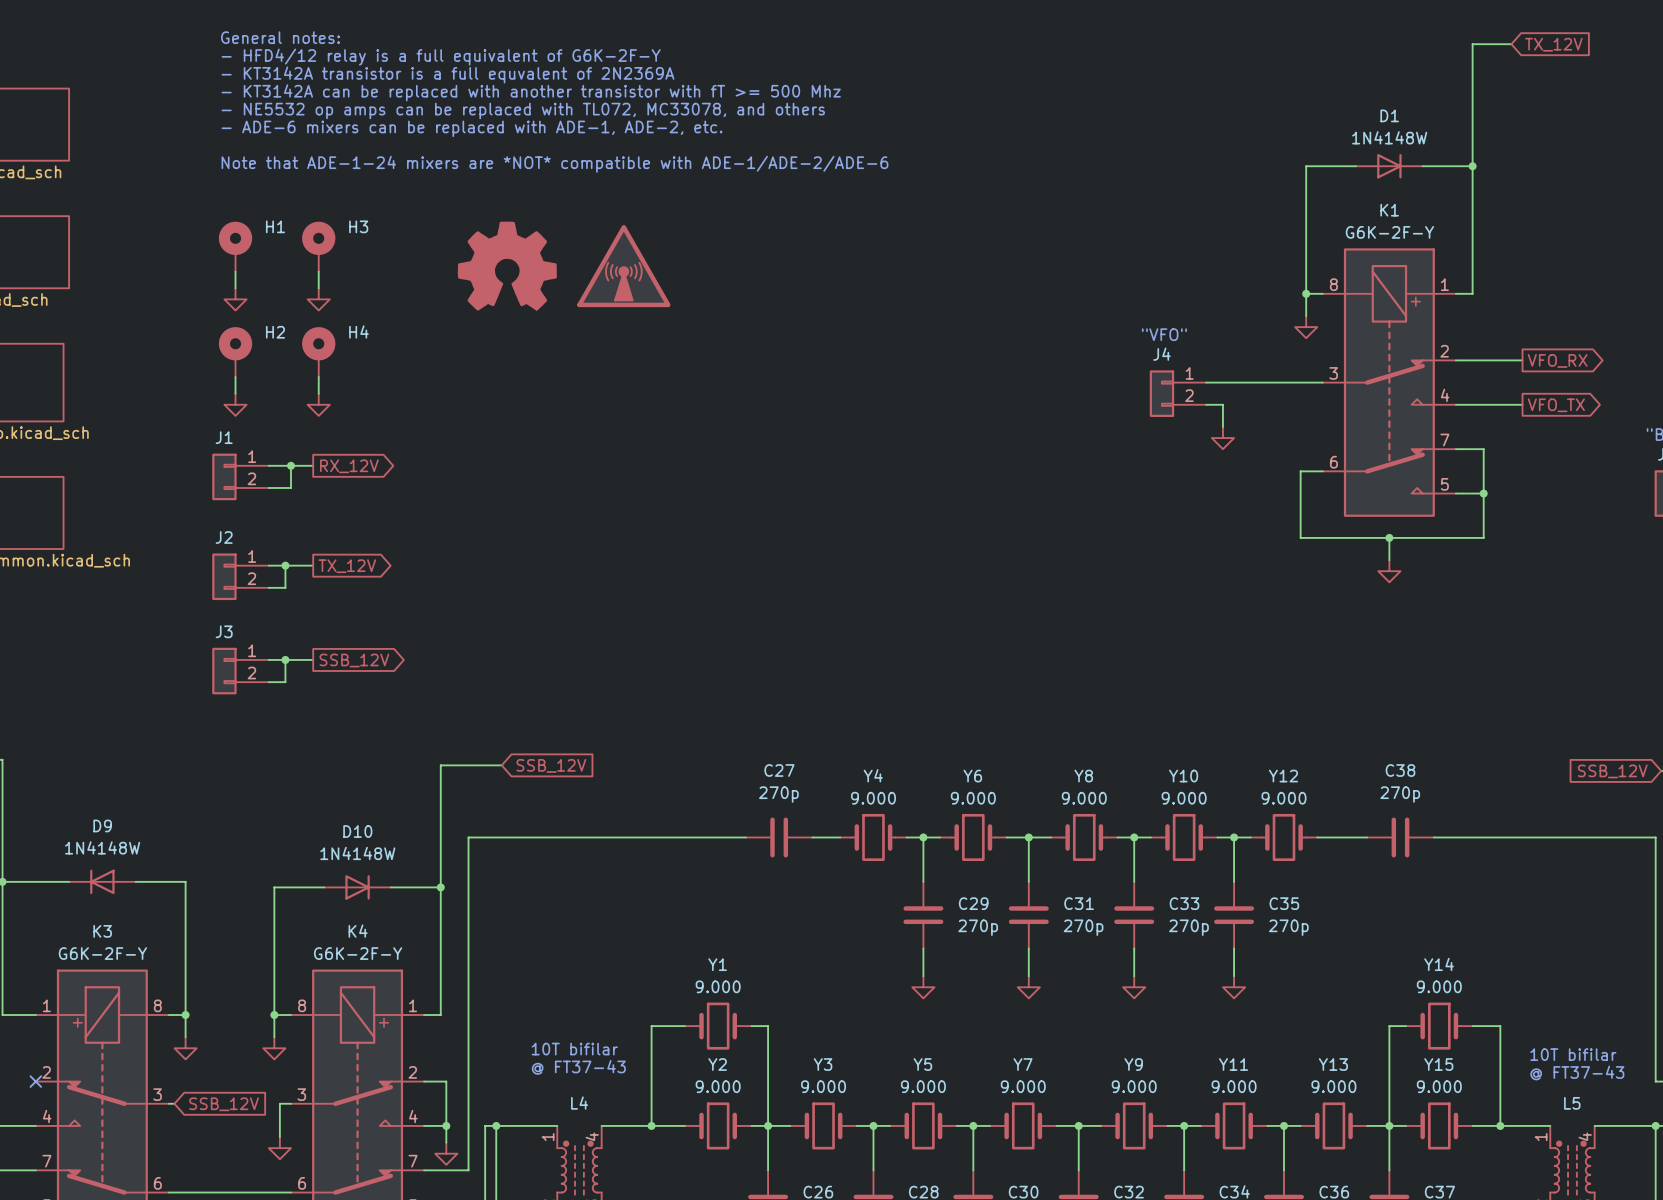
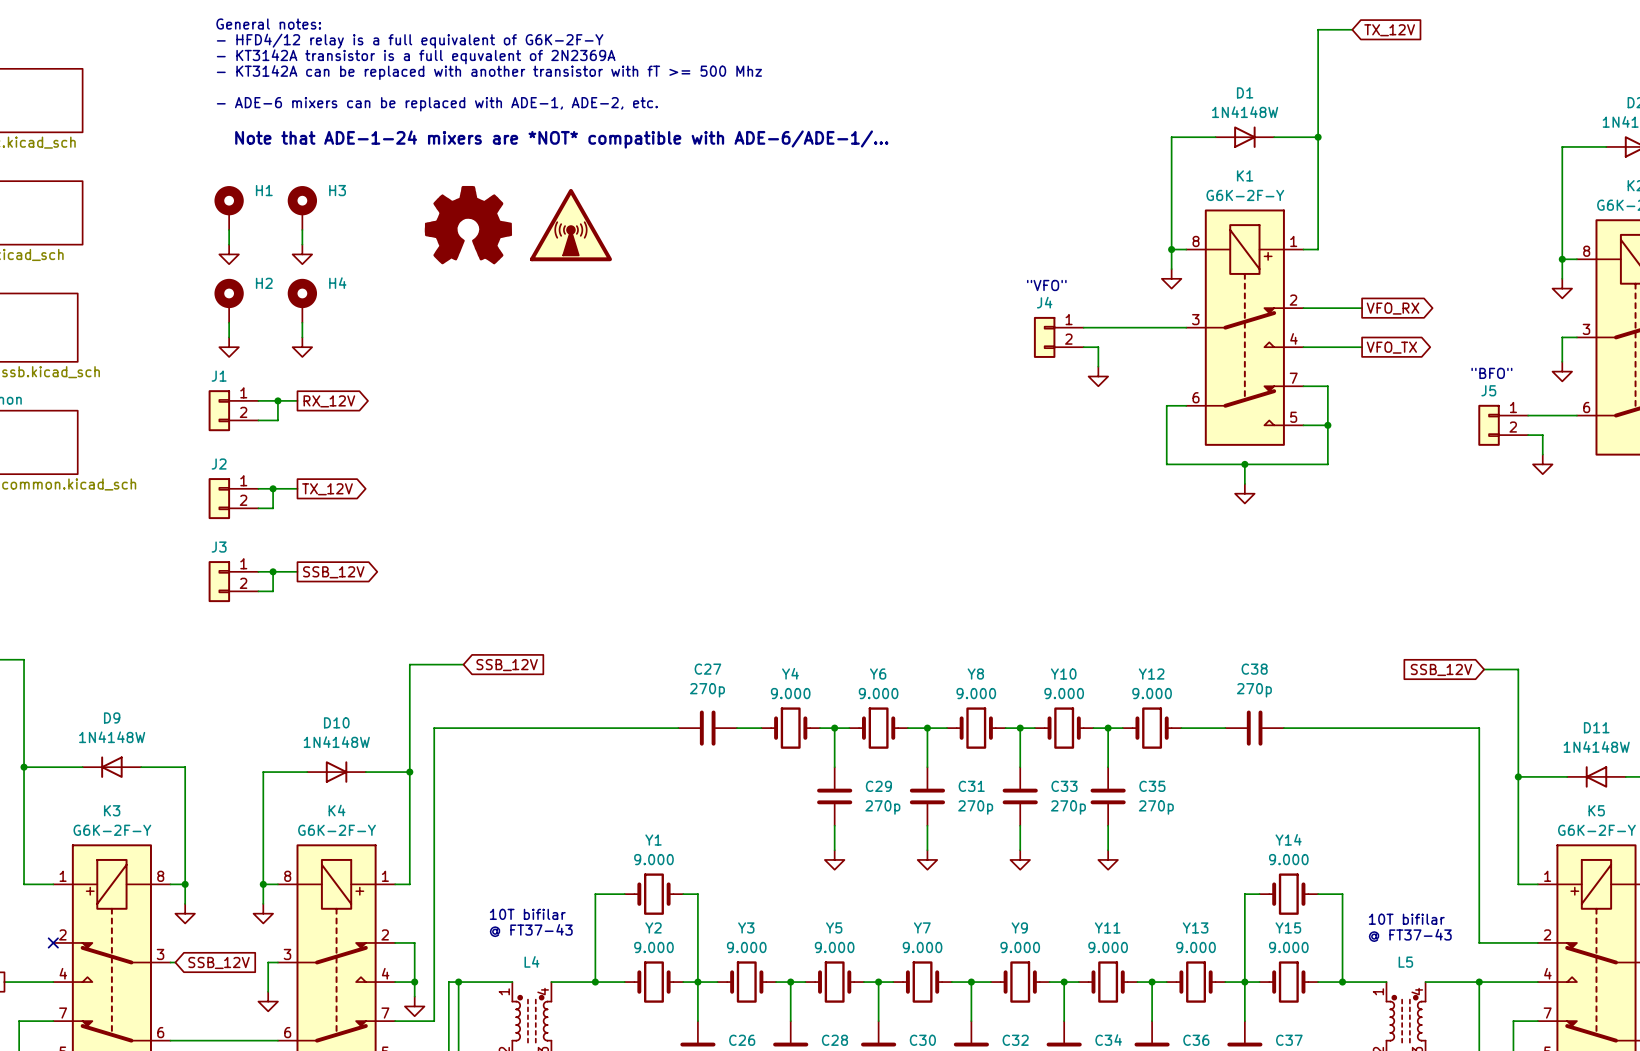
text: - NE5532 op amps can be replaced with TL072, MC33078, and others (523, 110) -> none
text: Note that ADE-1-24 mixers are *NOT* compatible with ADE-1/ADE-2/ADE-6 (554, 164) -> Note that ADE-1-24 mixers are *NOT* compatible with ADE-6/ADE-1/... (561, 139)

